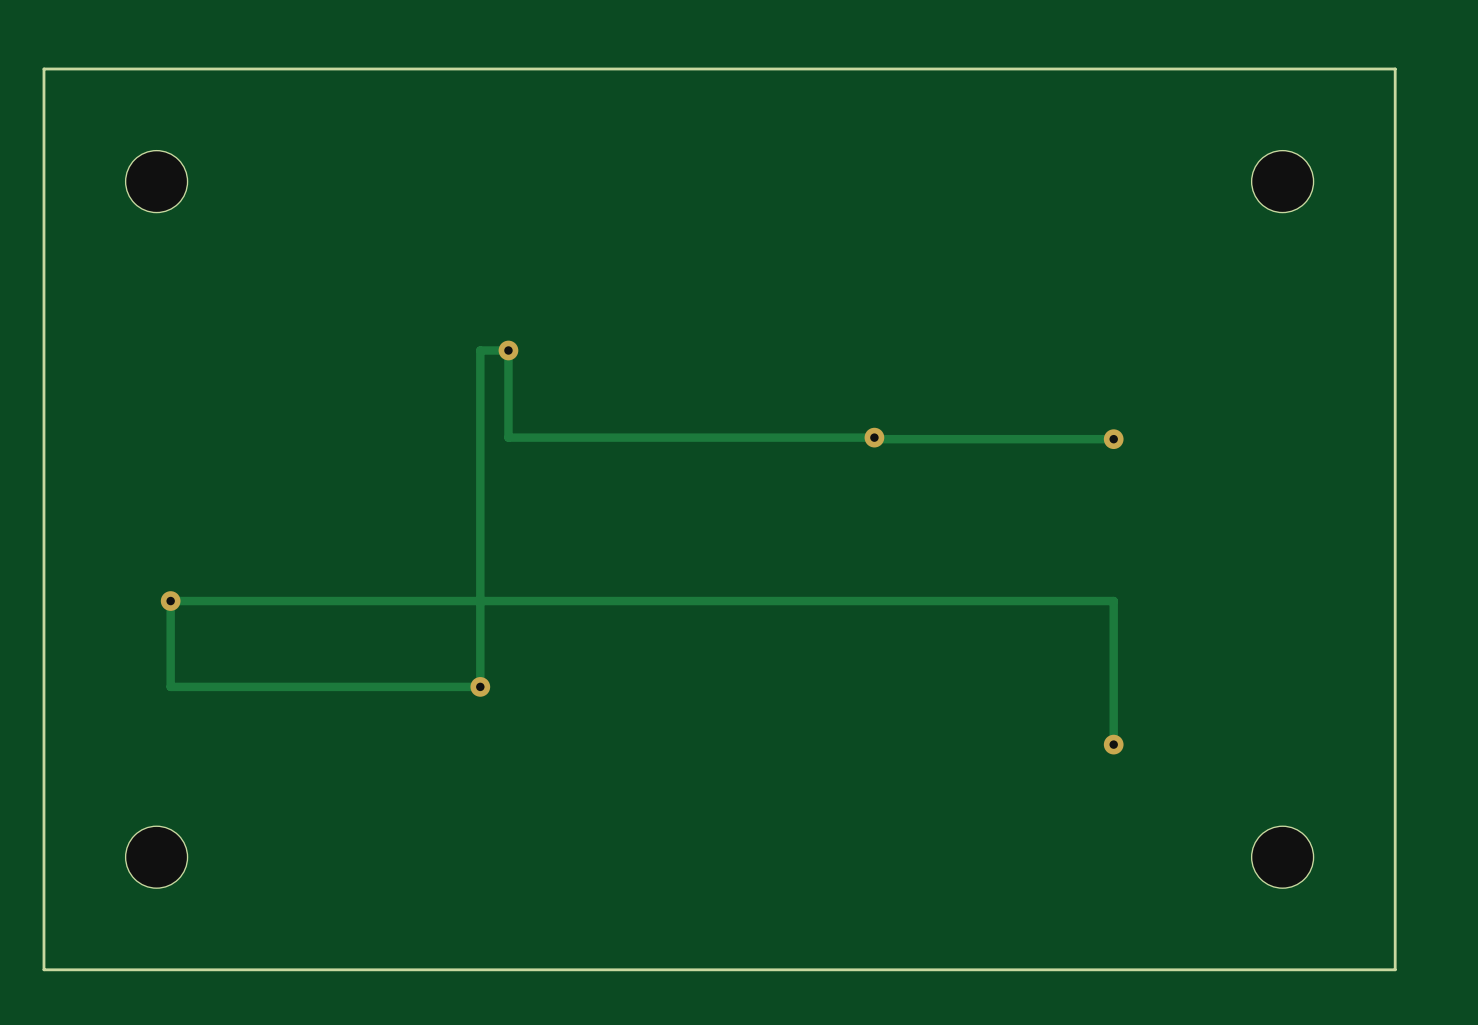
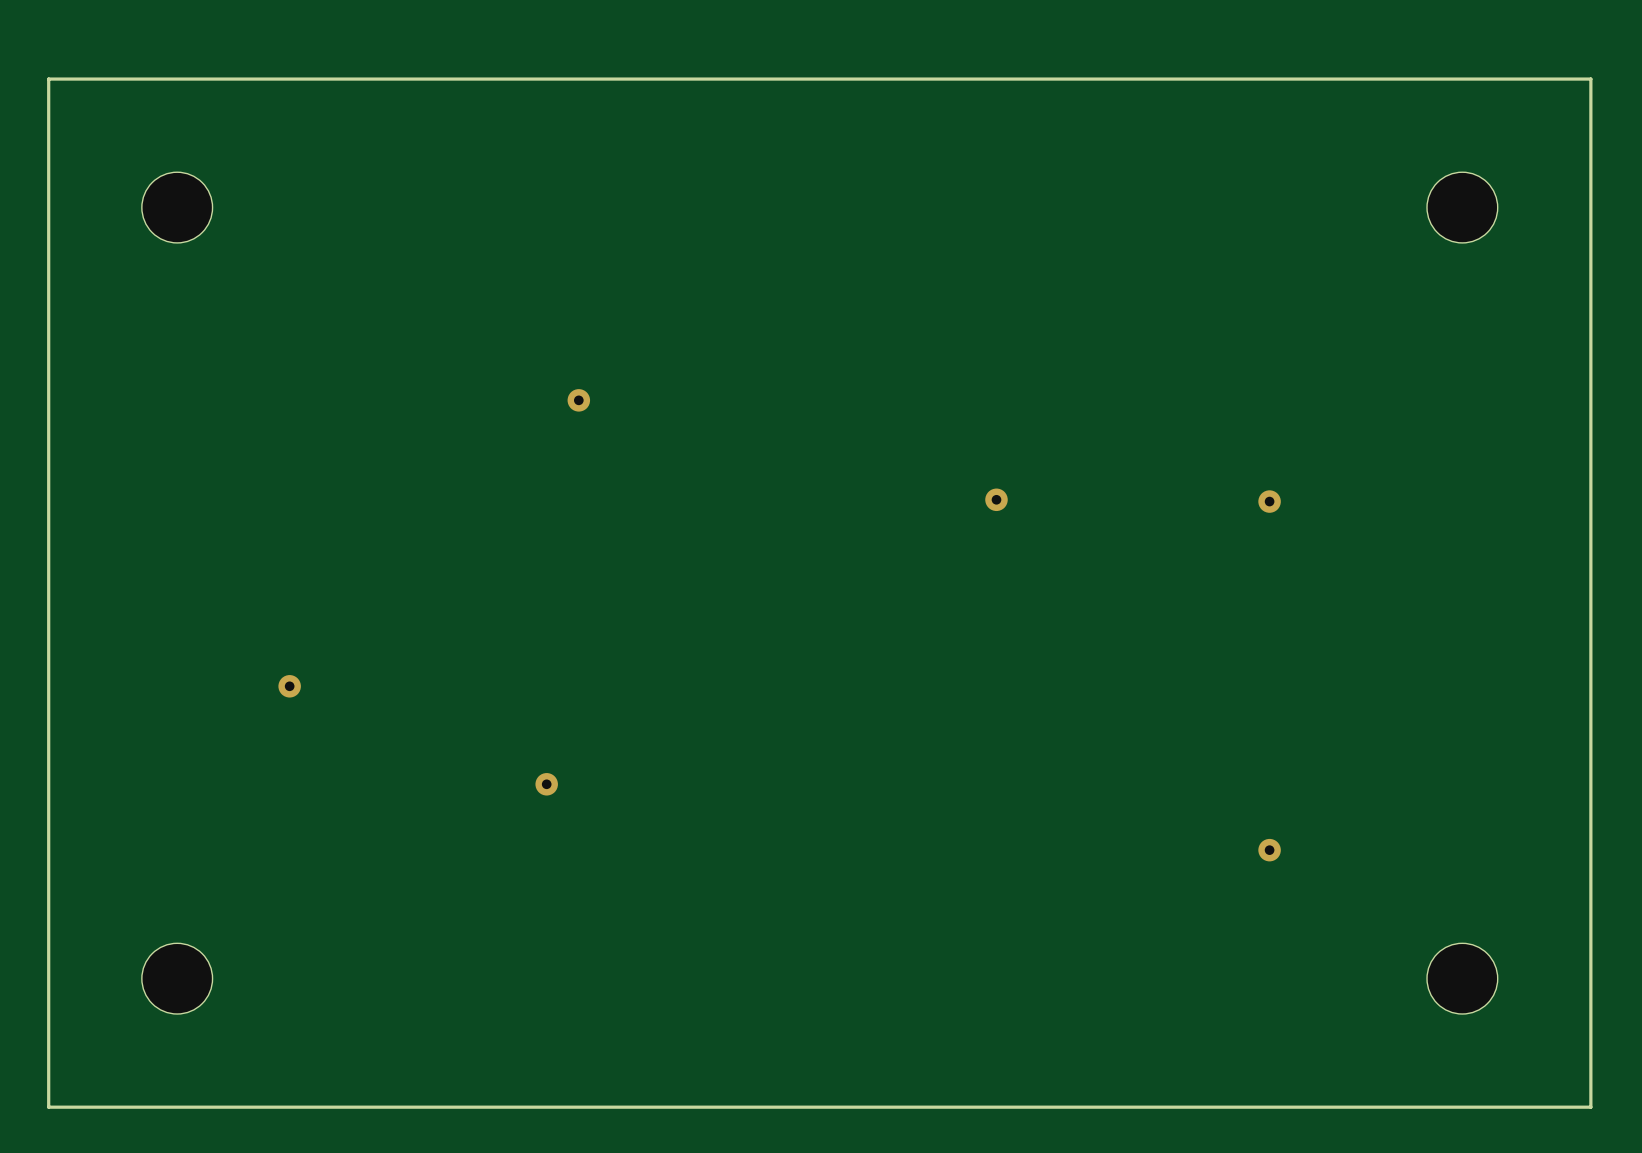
track: (1113, 439) (508, 437) (508, 350) (480, 350) (480, 686) (170, 686) (170, 601) (1113, 601) (1113, 744) -> none
via position: (170, 601) -> (289, 686)

